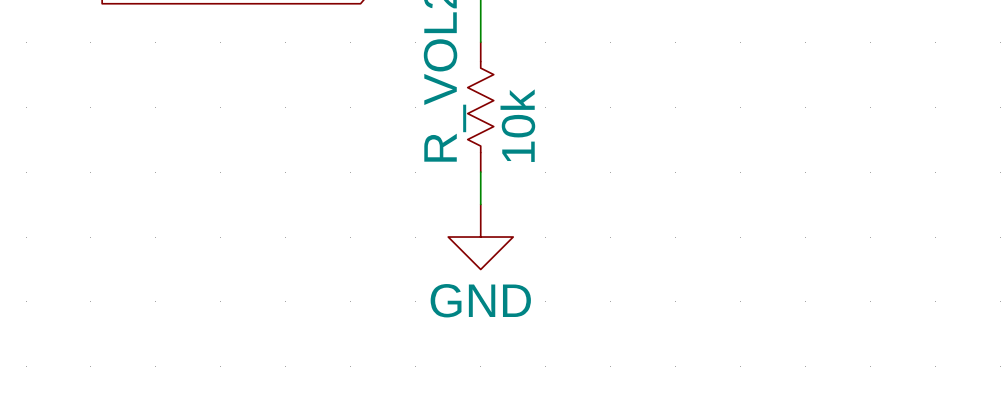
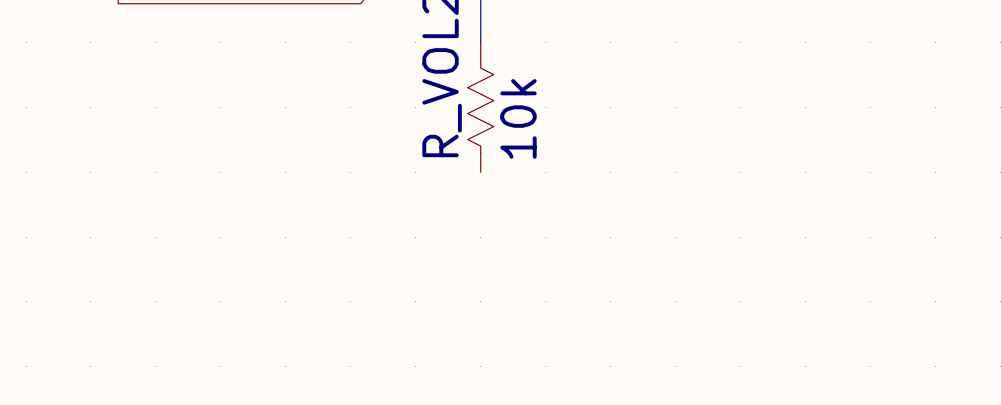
wire: (480, 172) (480, 204) -> none
power symbol: GND (480, 237) -> none

